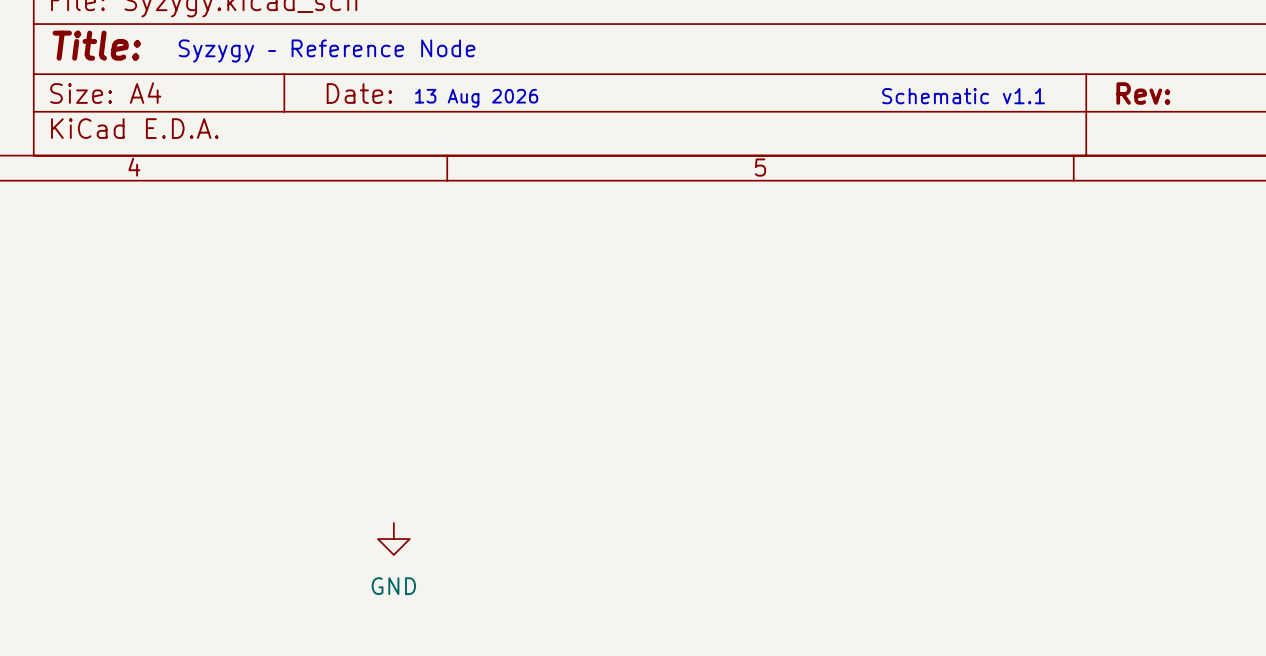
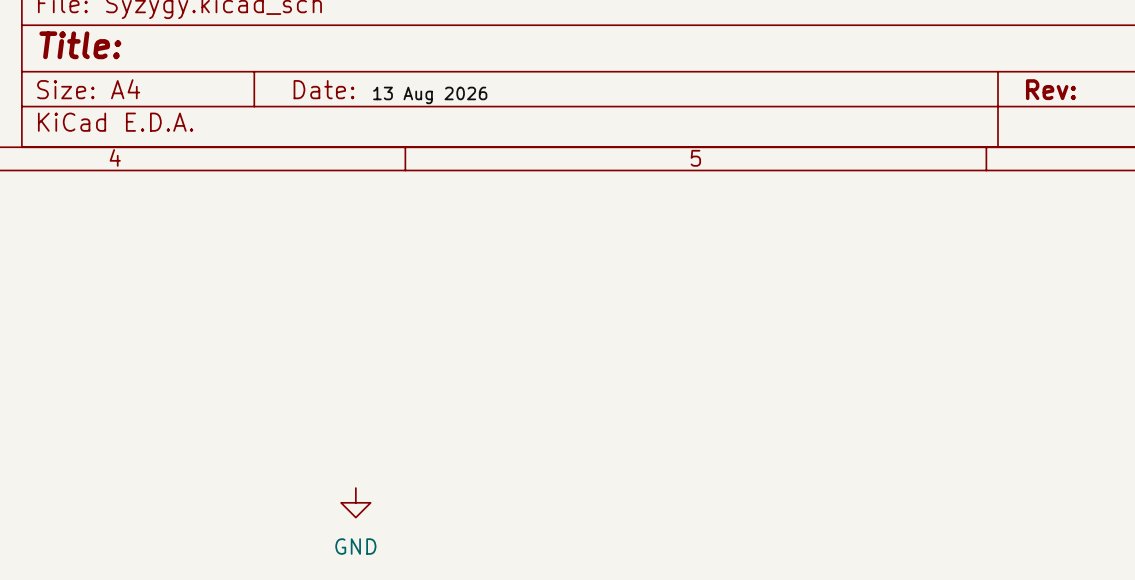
text: Syzygy – Reference Node (327, 51) -> none
text: Schematic v1.1 (963, 96) -> none
text: 13 Aug 2026 (476, 98) -> none
label: none -> 13 Aug 2026 (430, 95)

